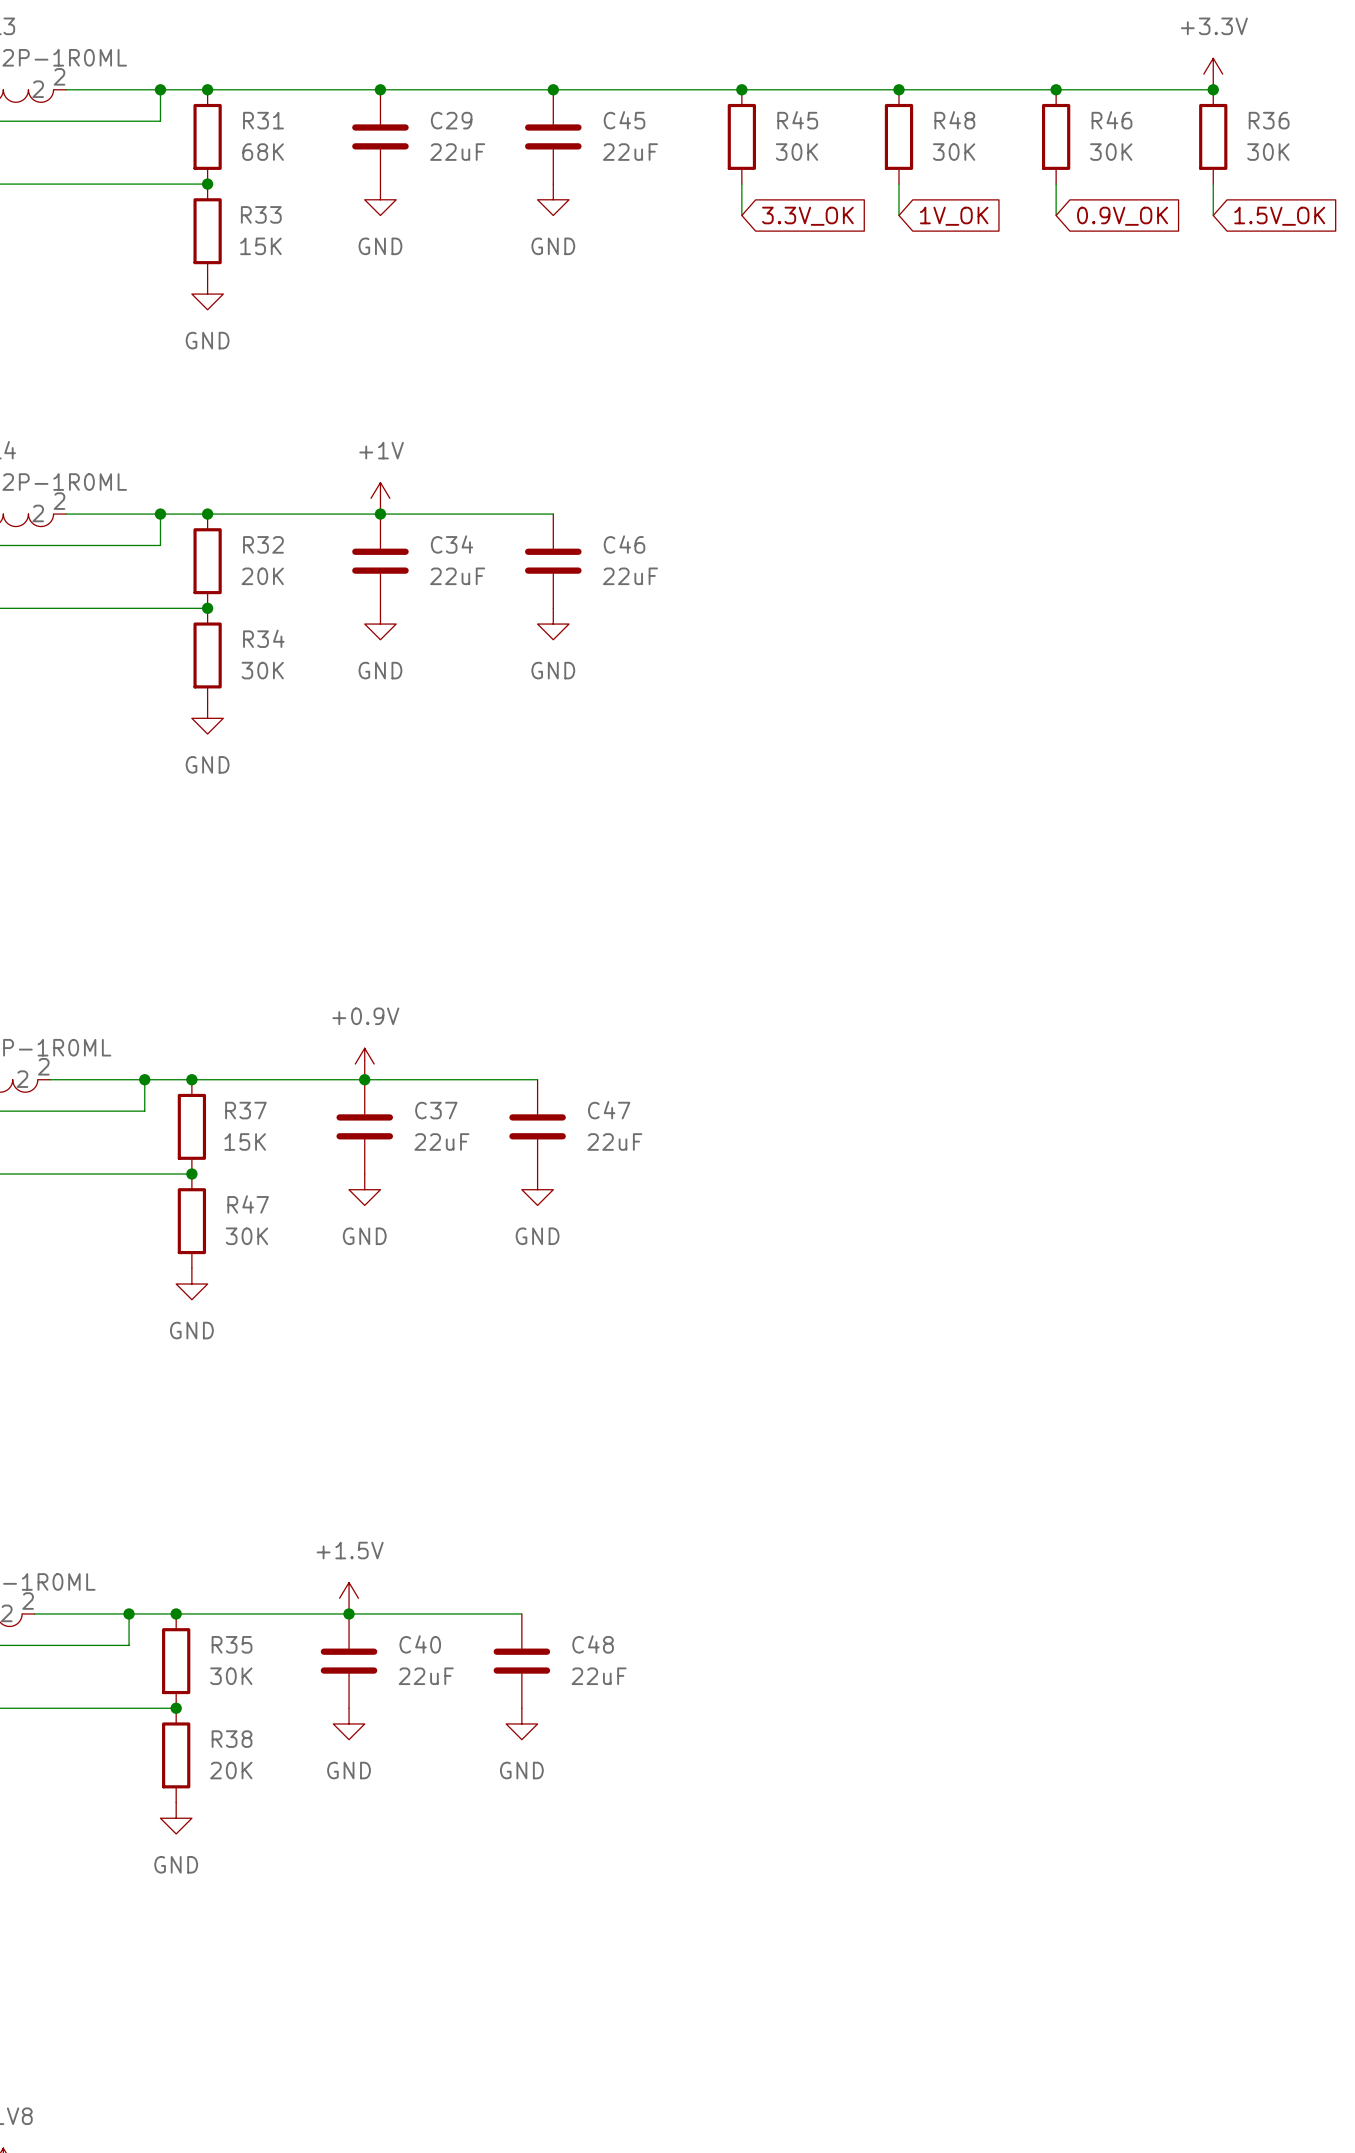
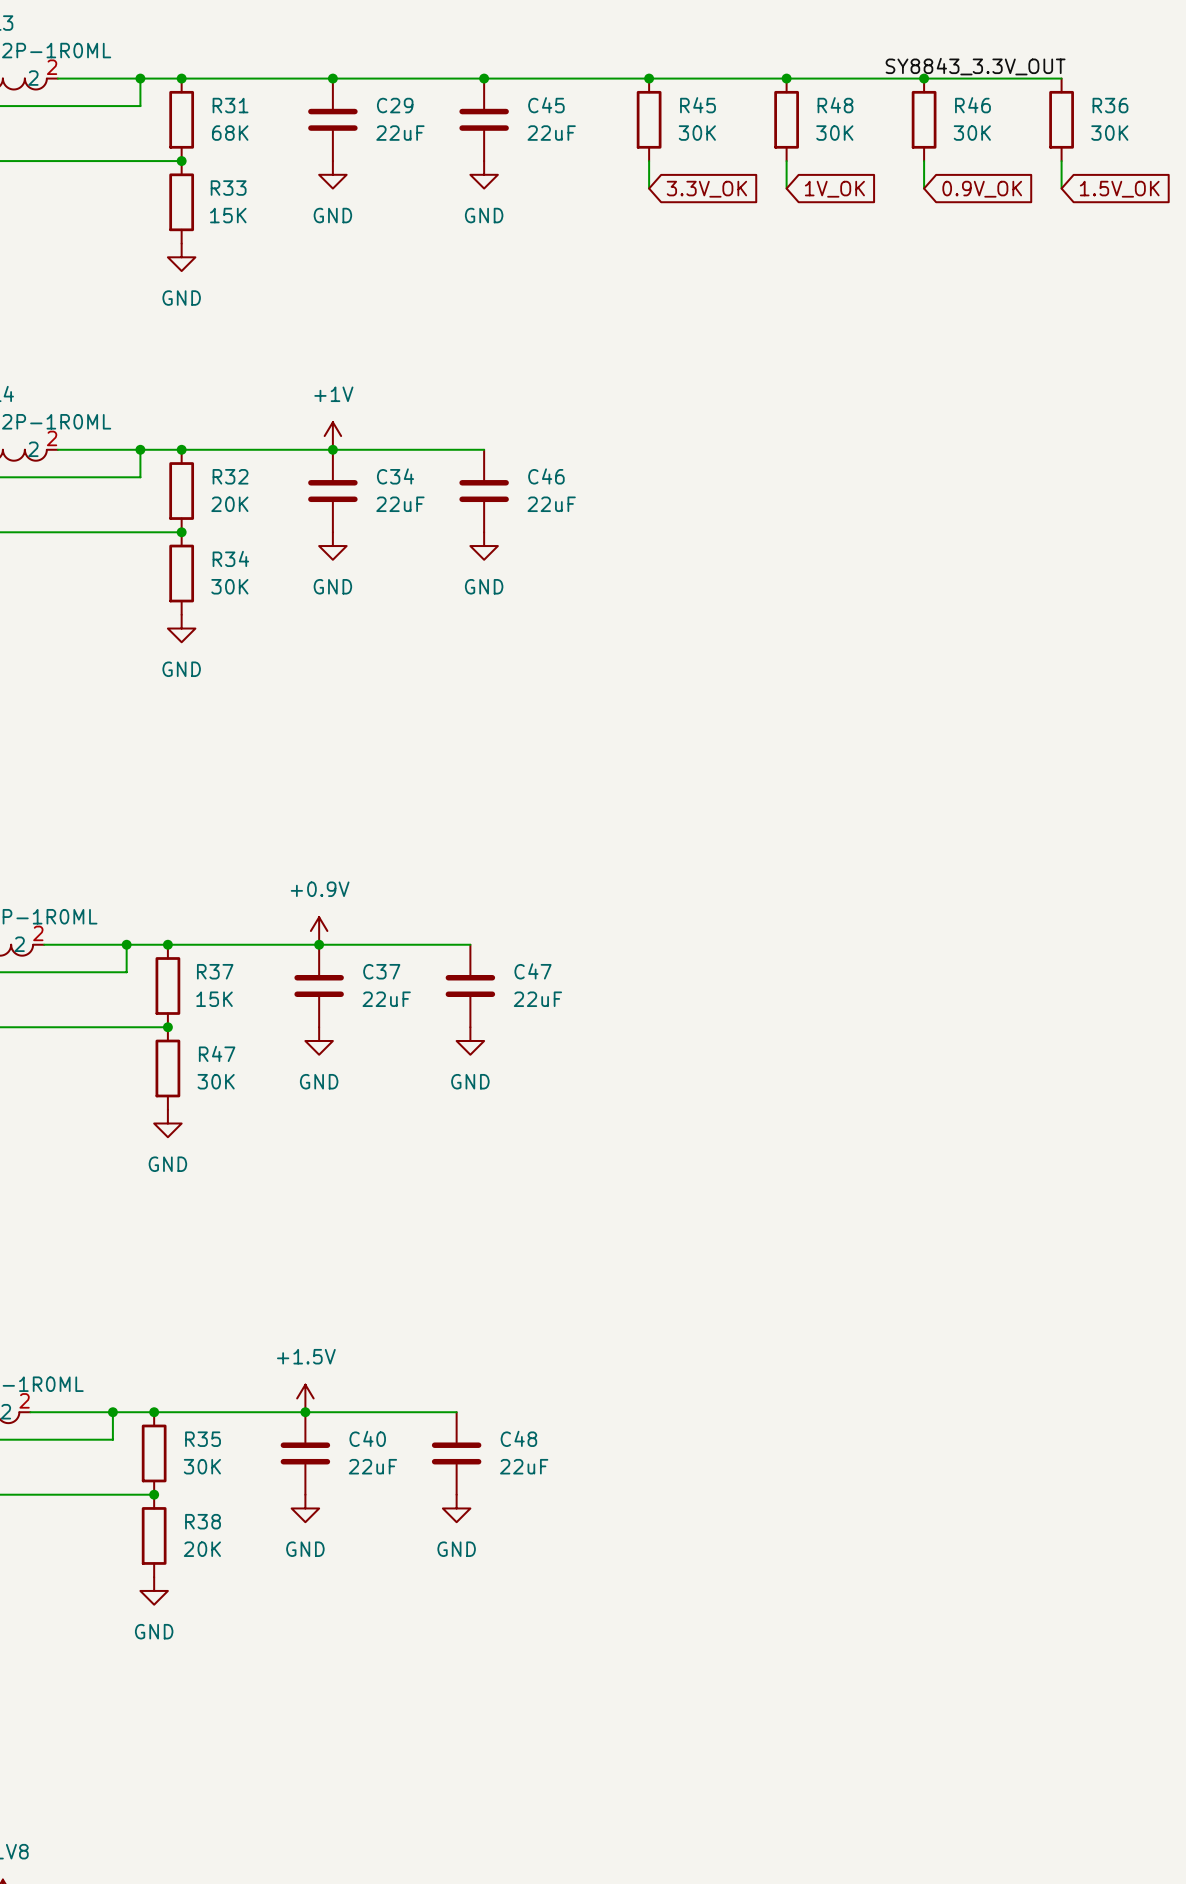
power symbol: +3.3V (1213, 74) -> none
label: none -> SY8843_3.3V_OUT (975, 66)
junction: (1213, 89) -> none

